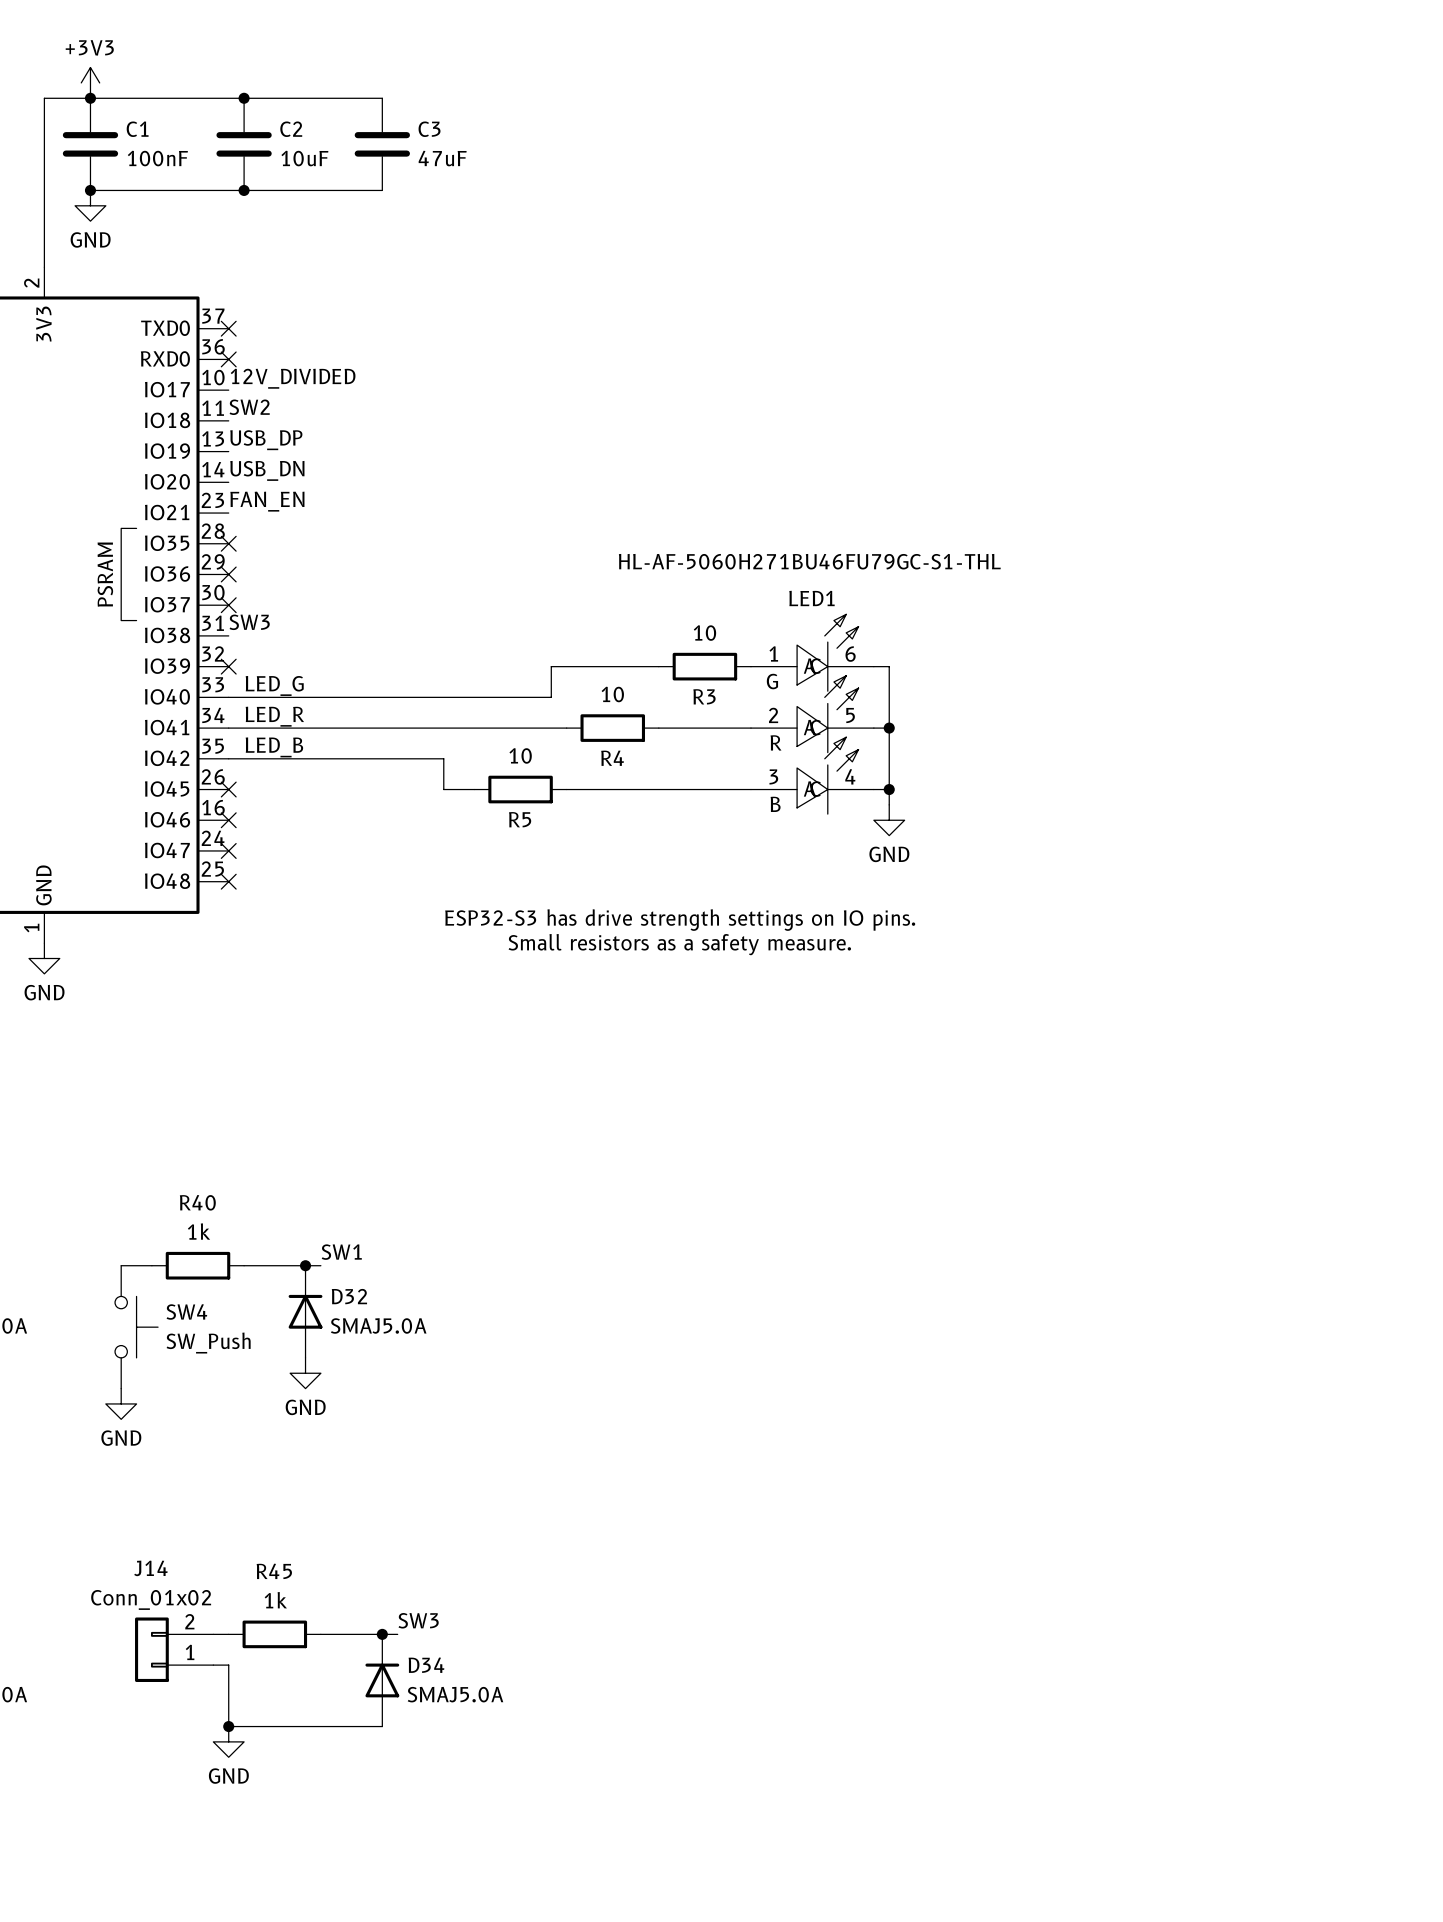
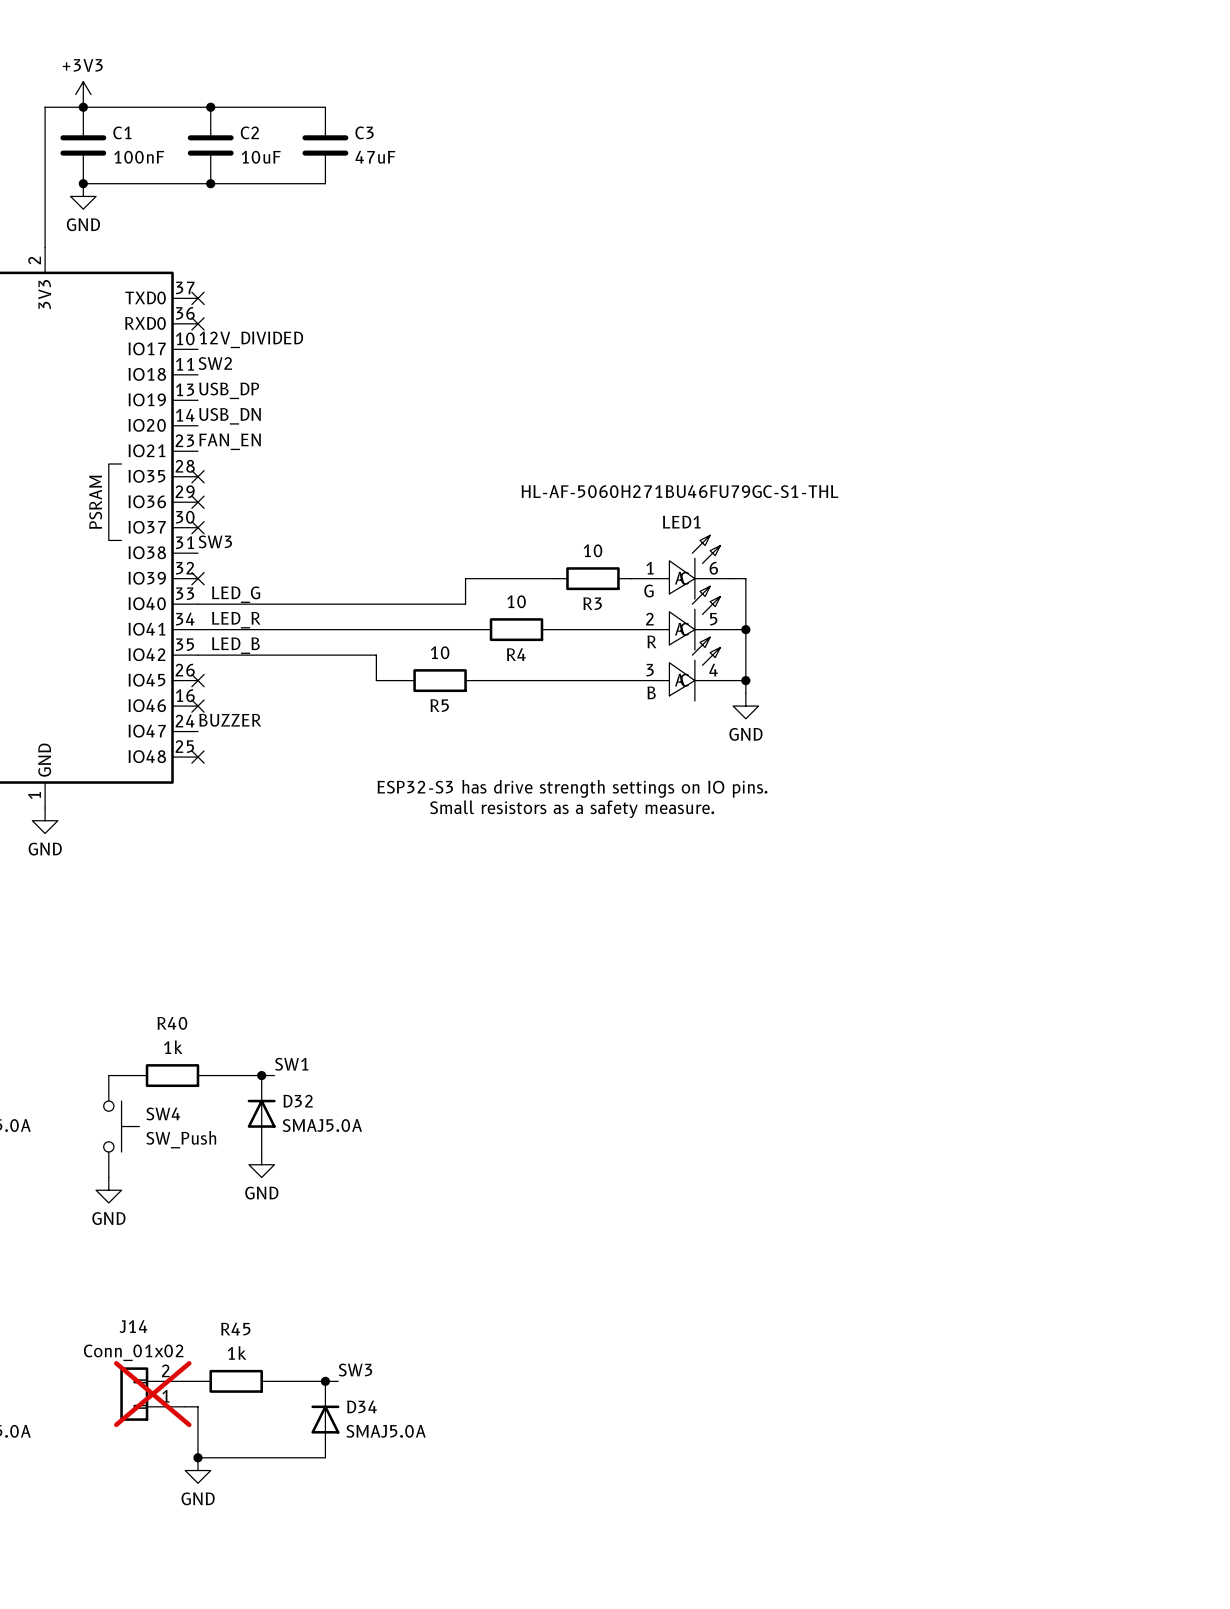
label: none -> BUZZER (230, 720)
no-connect mark: (228, 850) -> none
J14 do-not-place cross: none -> (152, 1394)

